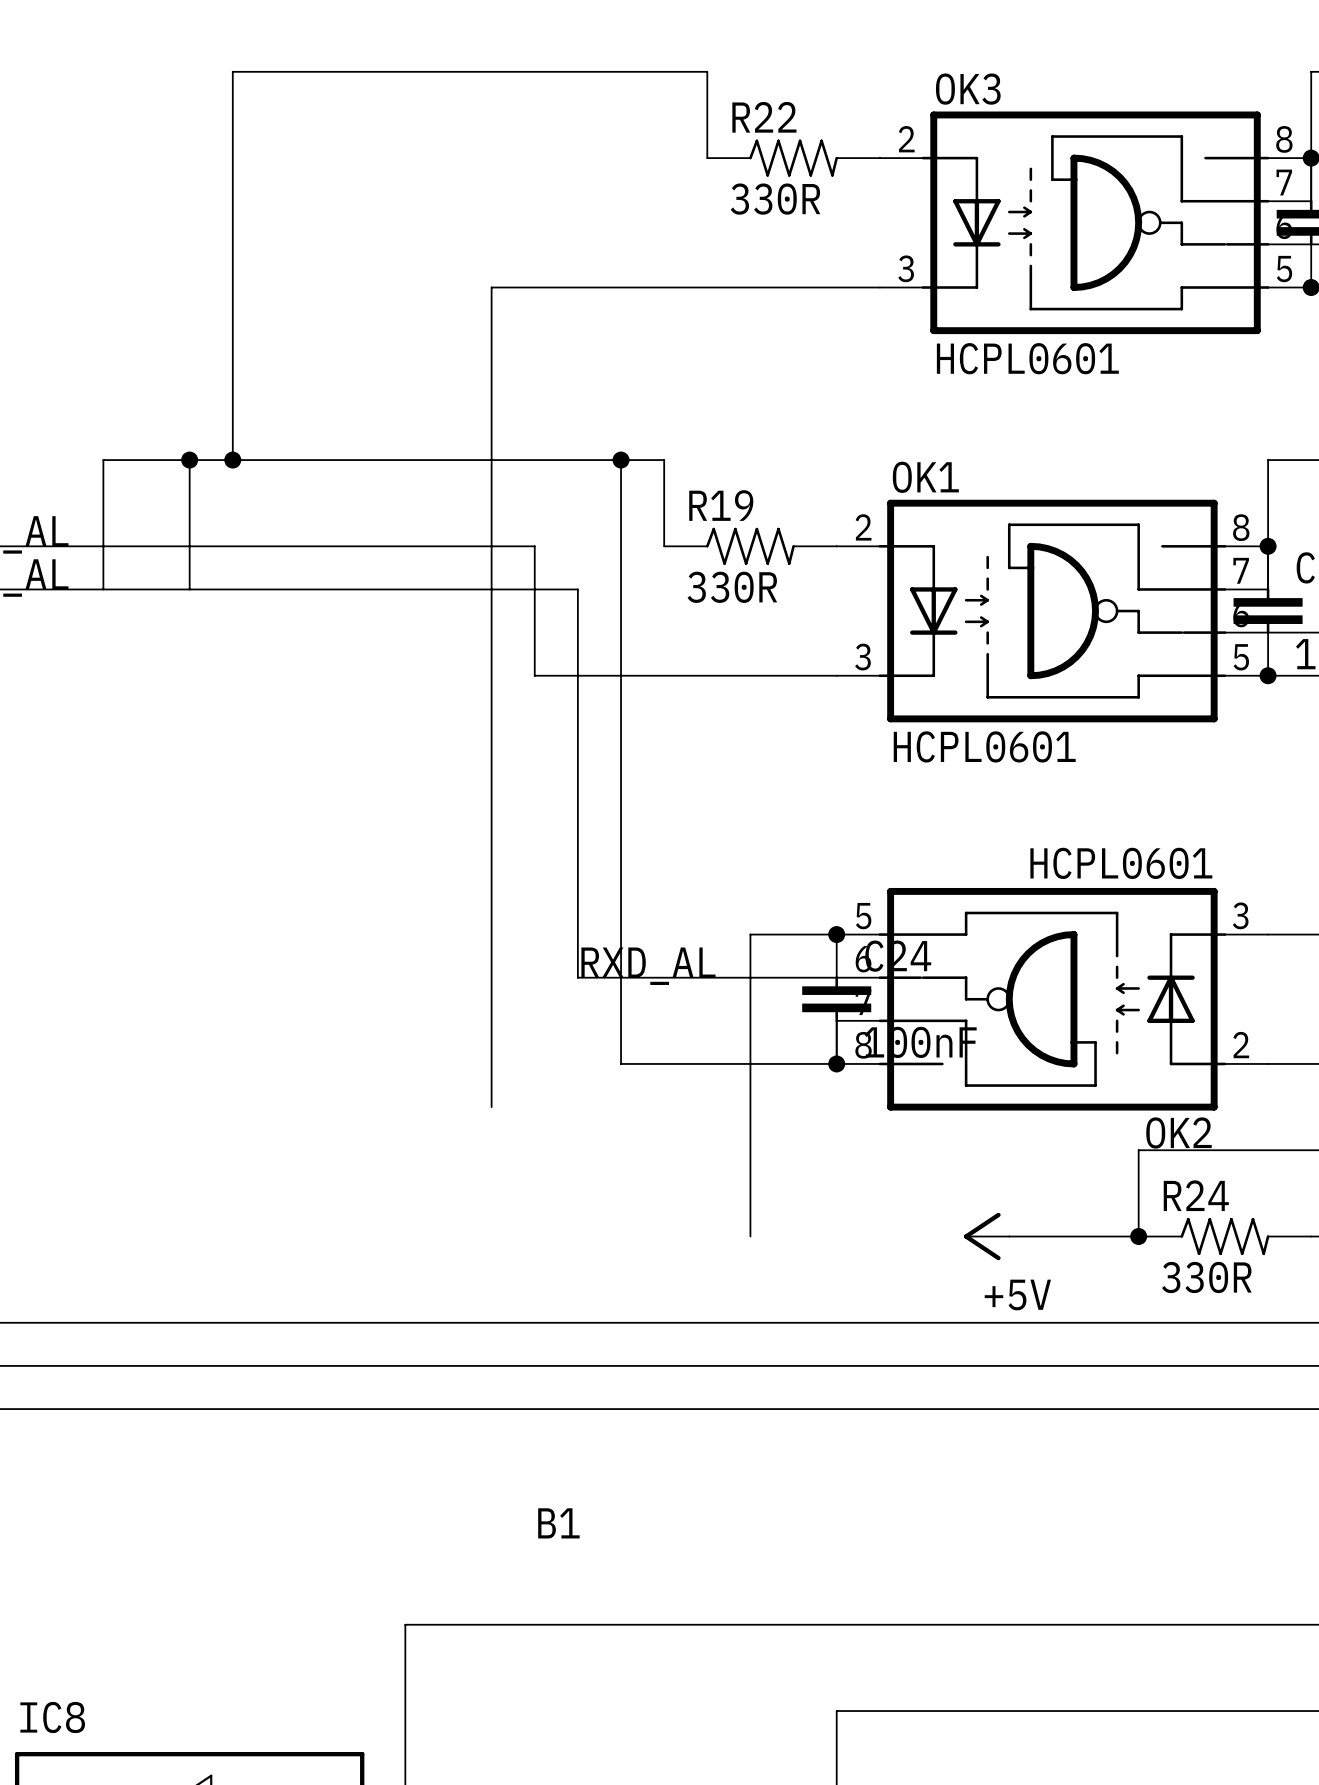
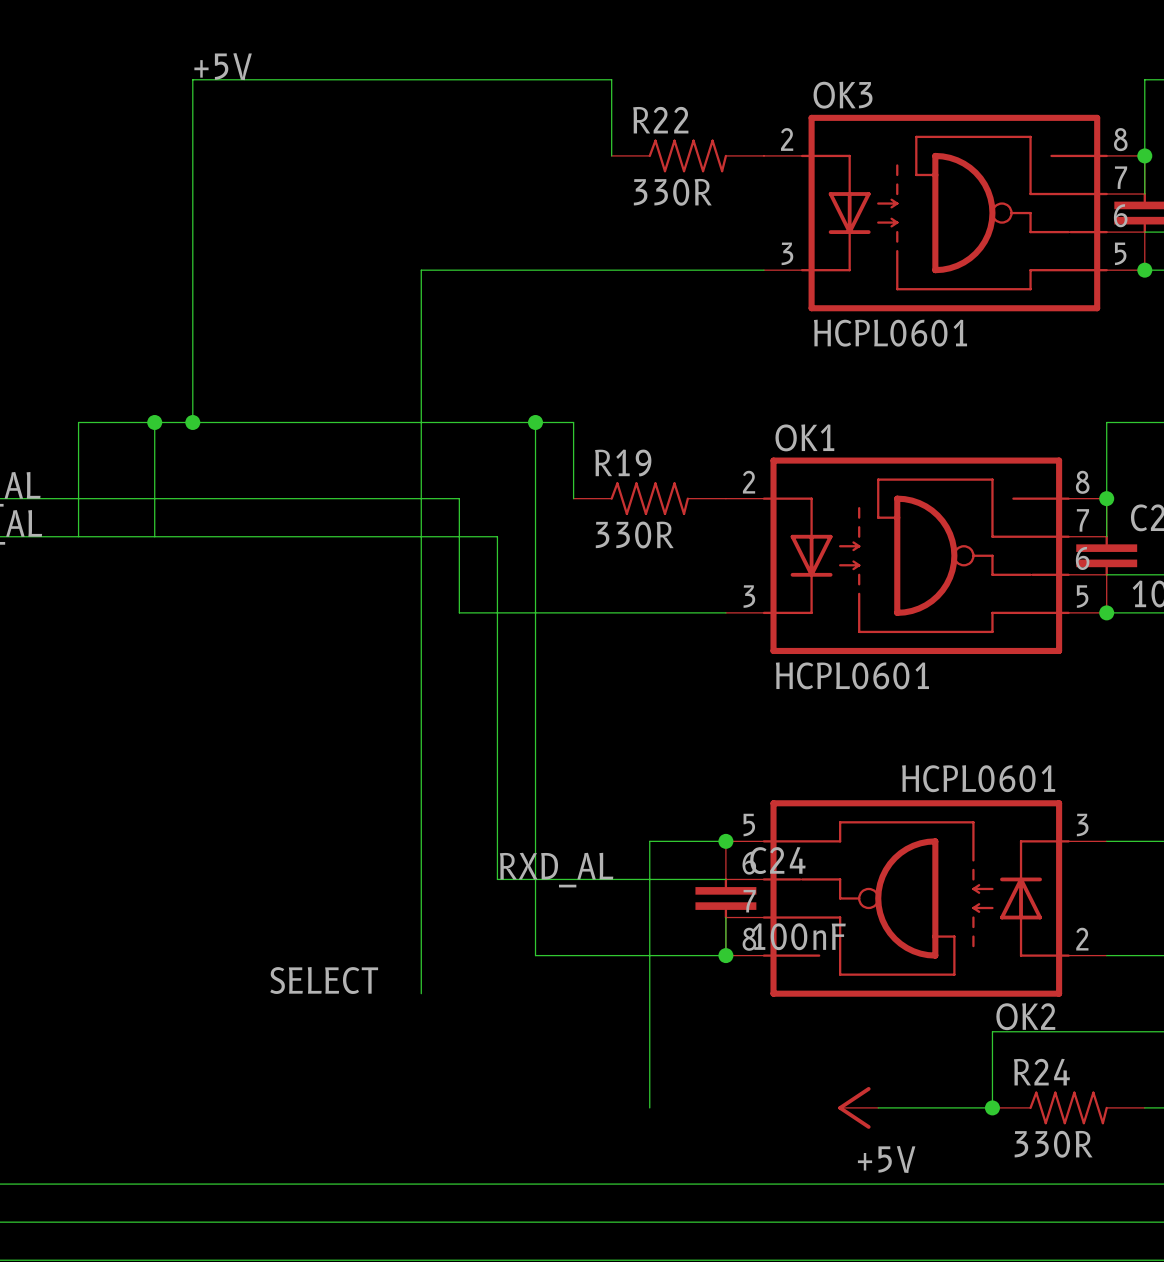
label: none -> +5V (223, 66)
label: none -> SELECT (324, 980)

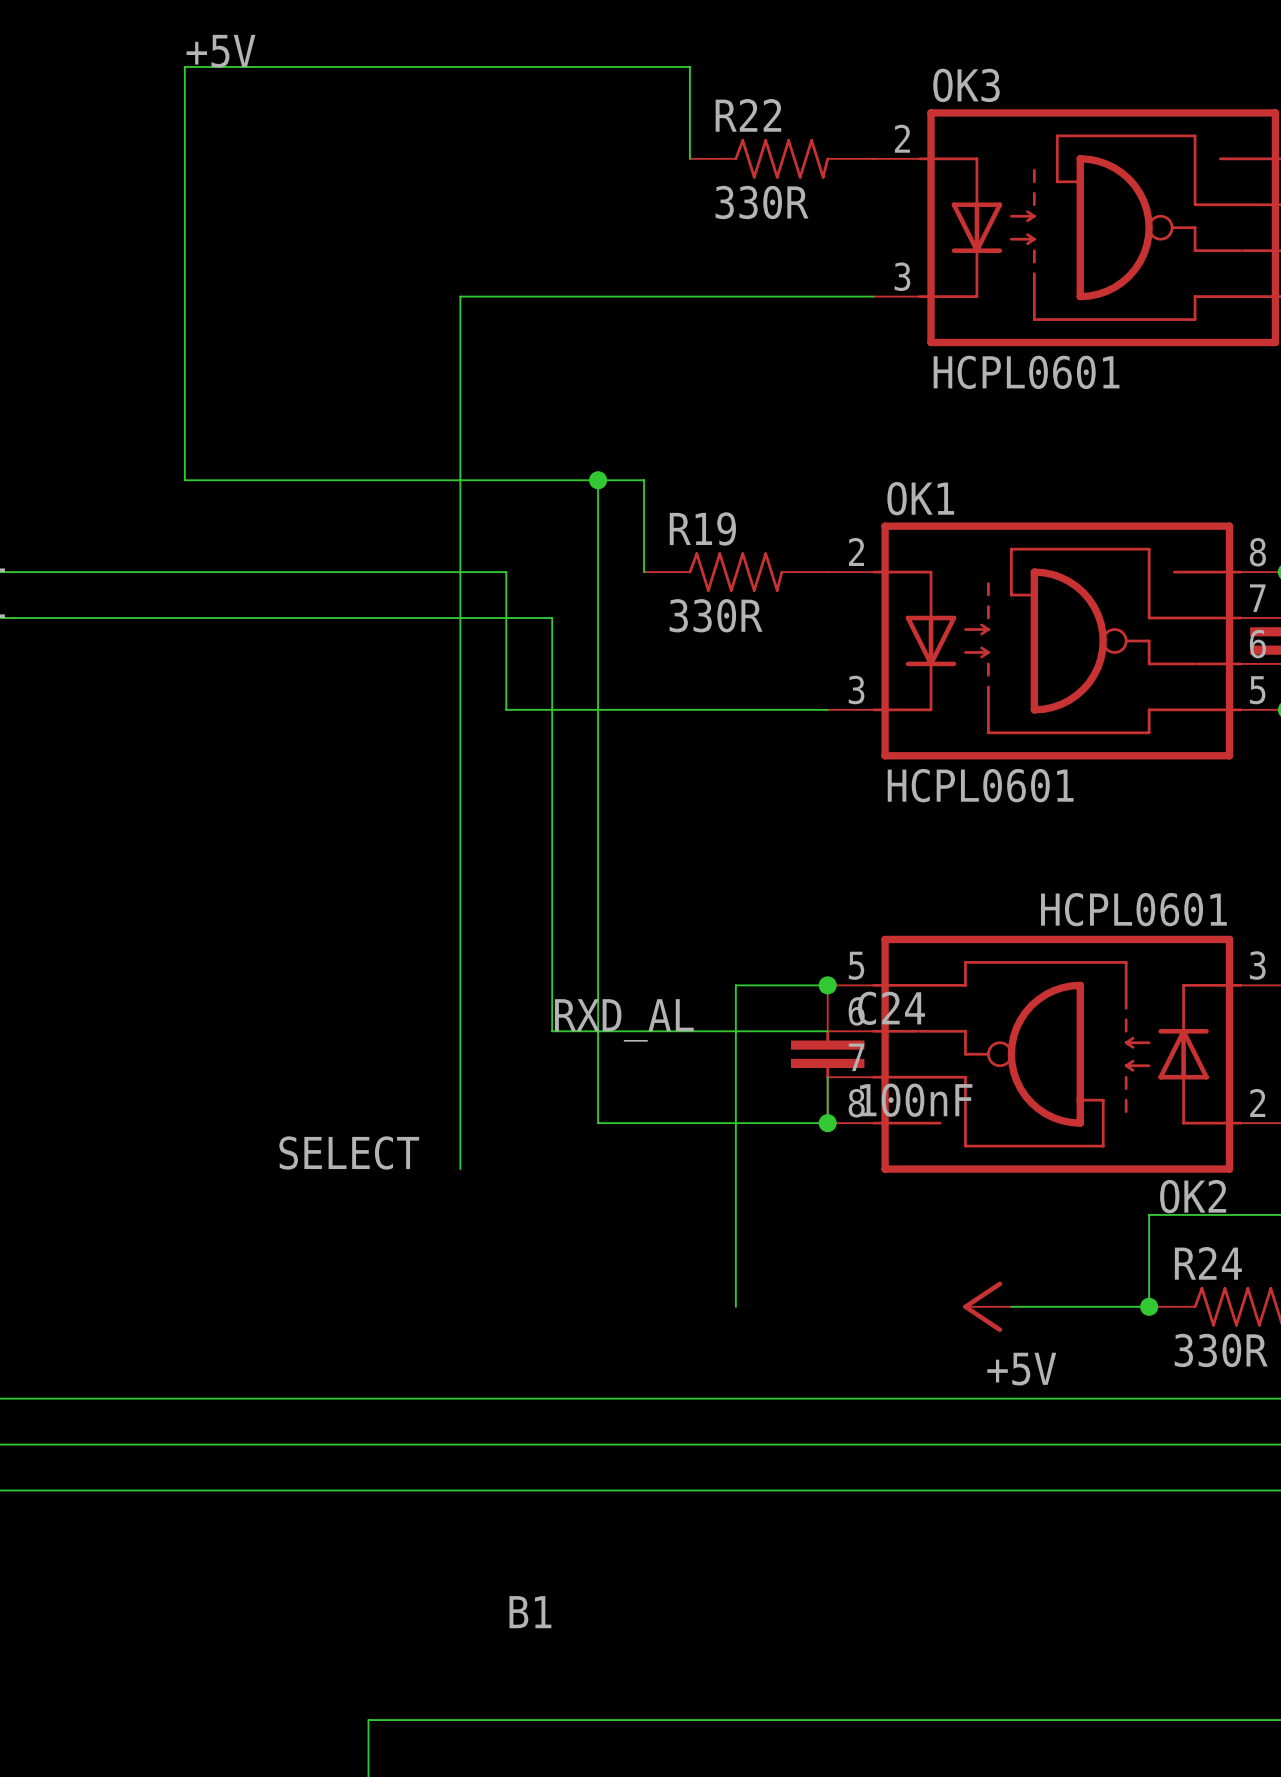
wire: (154, 422) (154, 536) -> none
junction: (154, 422) -> none
wire: (192, 422) (78, 422) (78, 536) -> none
junction: (192, 422) -> none

